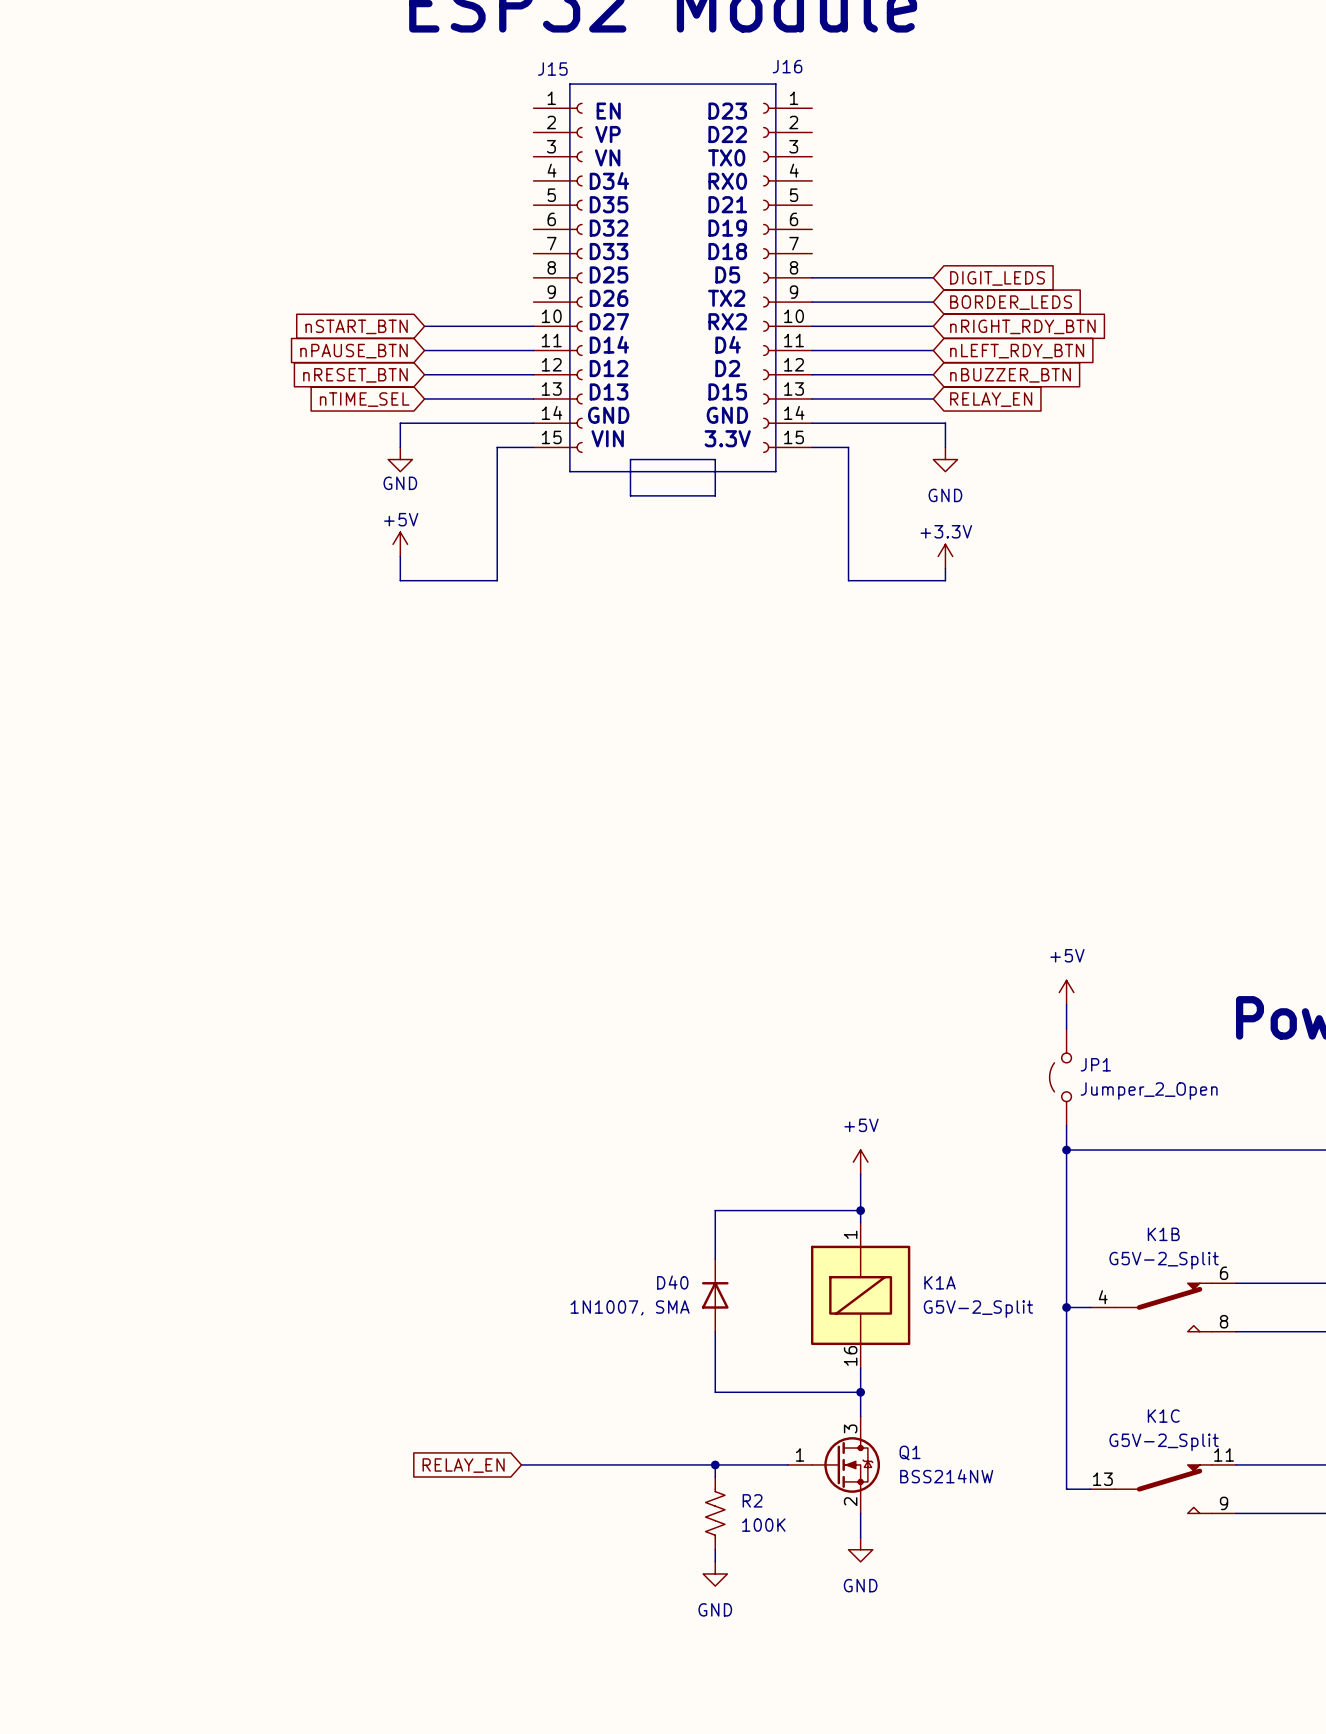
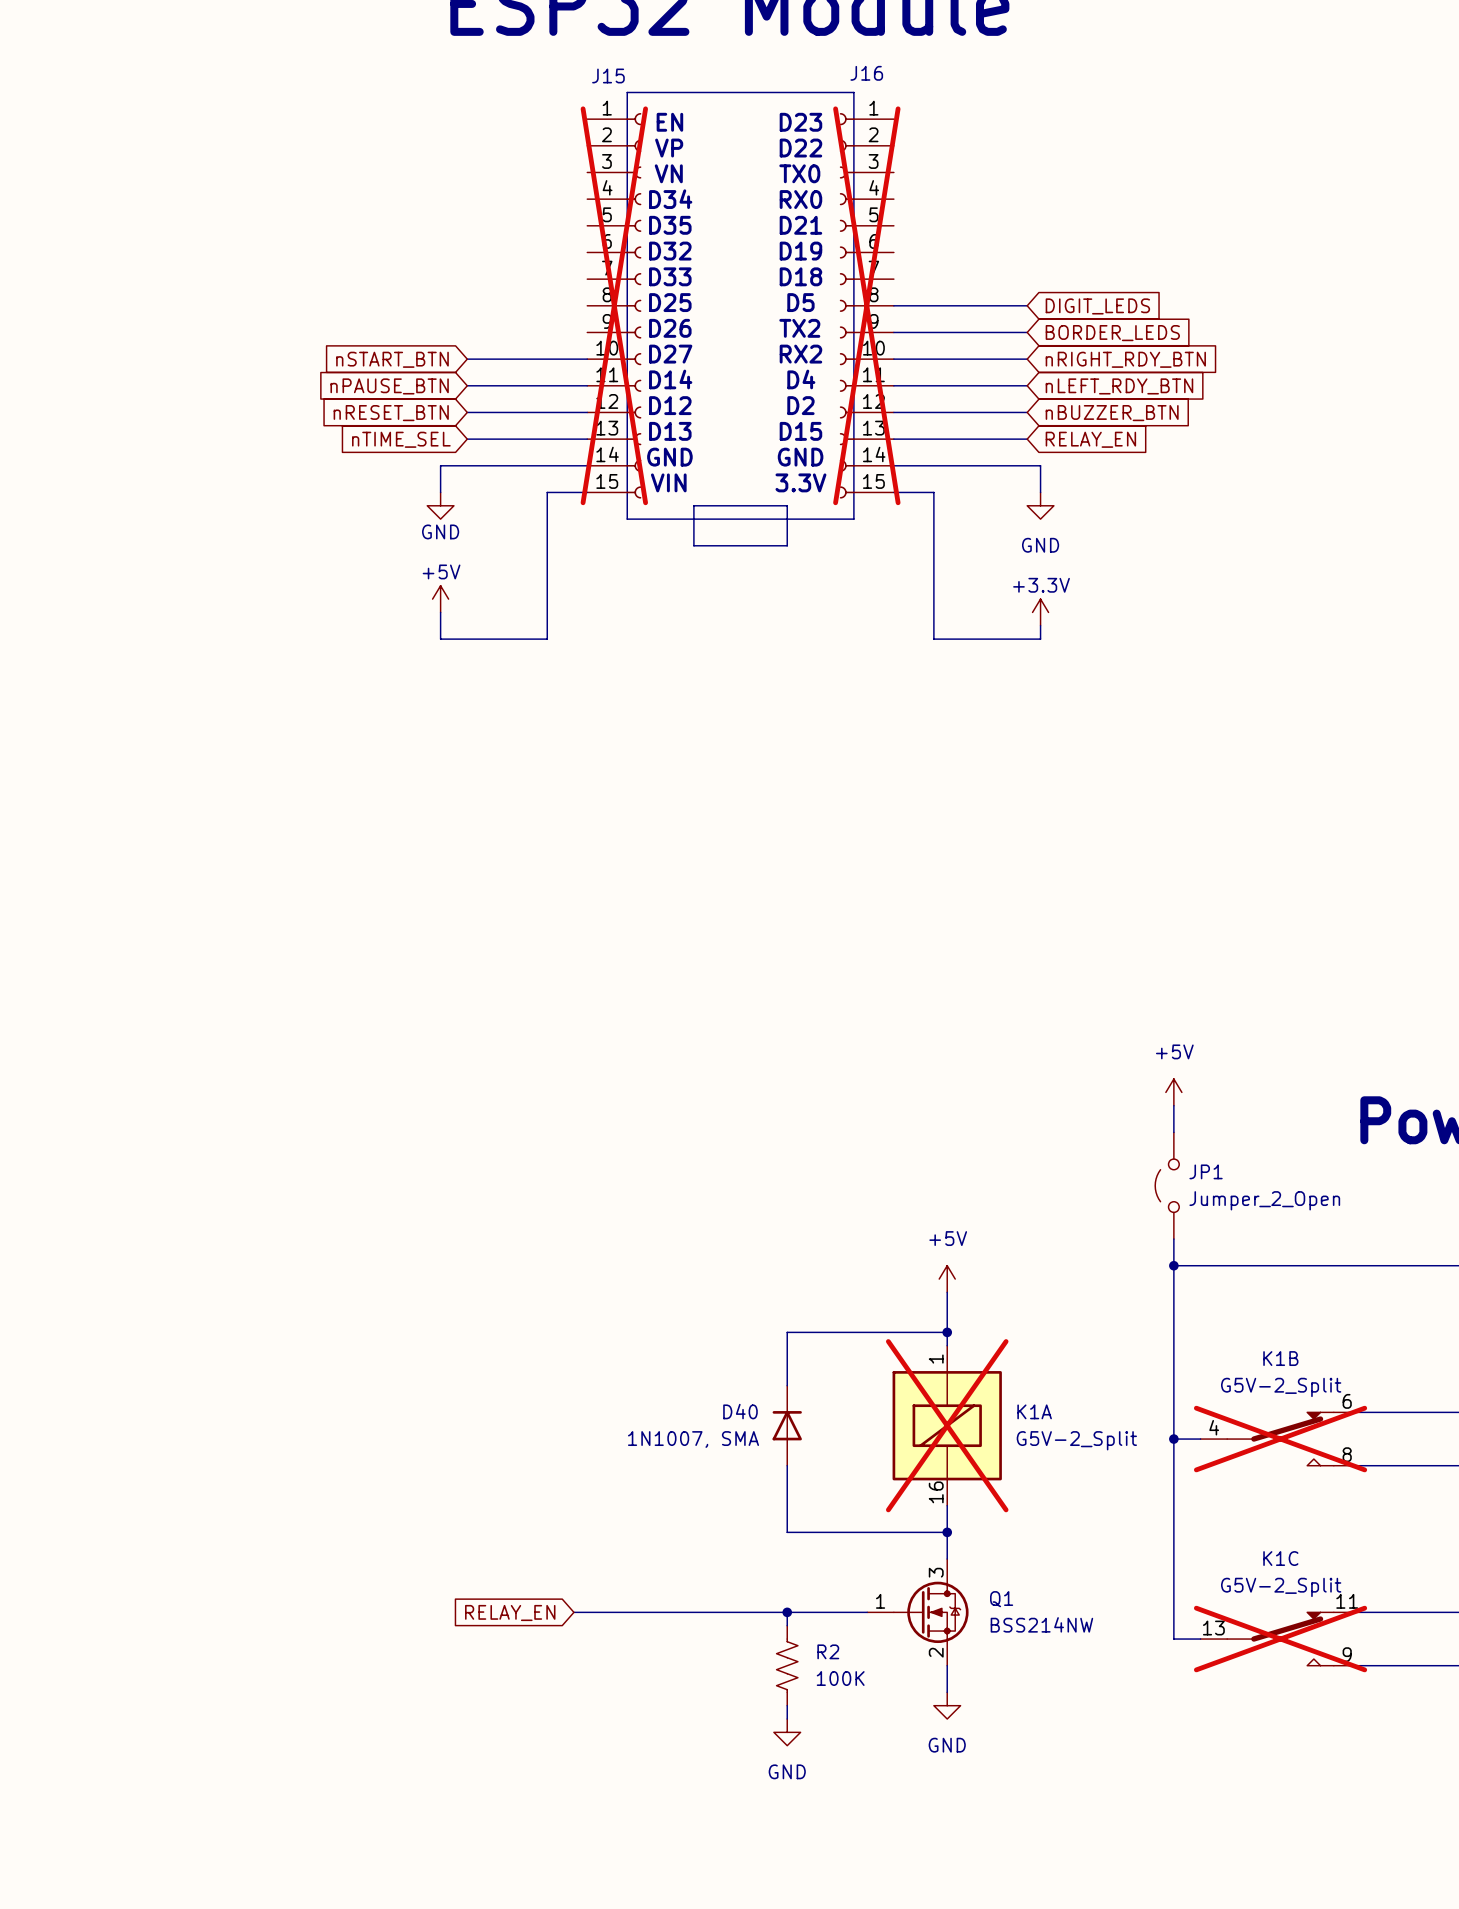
J15 do-not-place cross: none -> (614, 305)
J16 do-not-place cross: none -> (866, 305)
K1A do-not-place cross: none -> (947, 1425)
K1B do-not-place cross: none -> (1280, 1439)
K1C do-not-place cross: none -> (1280, 1639)

